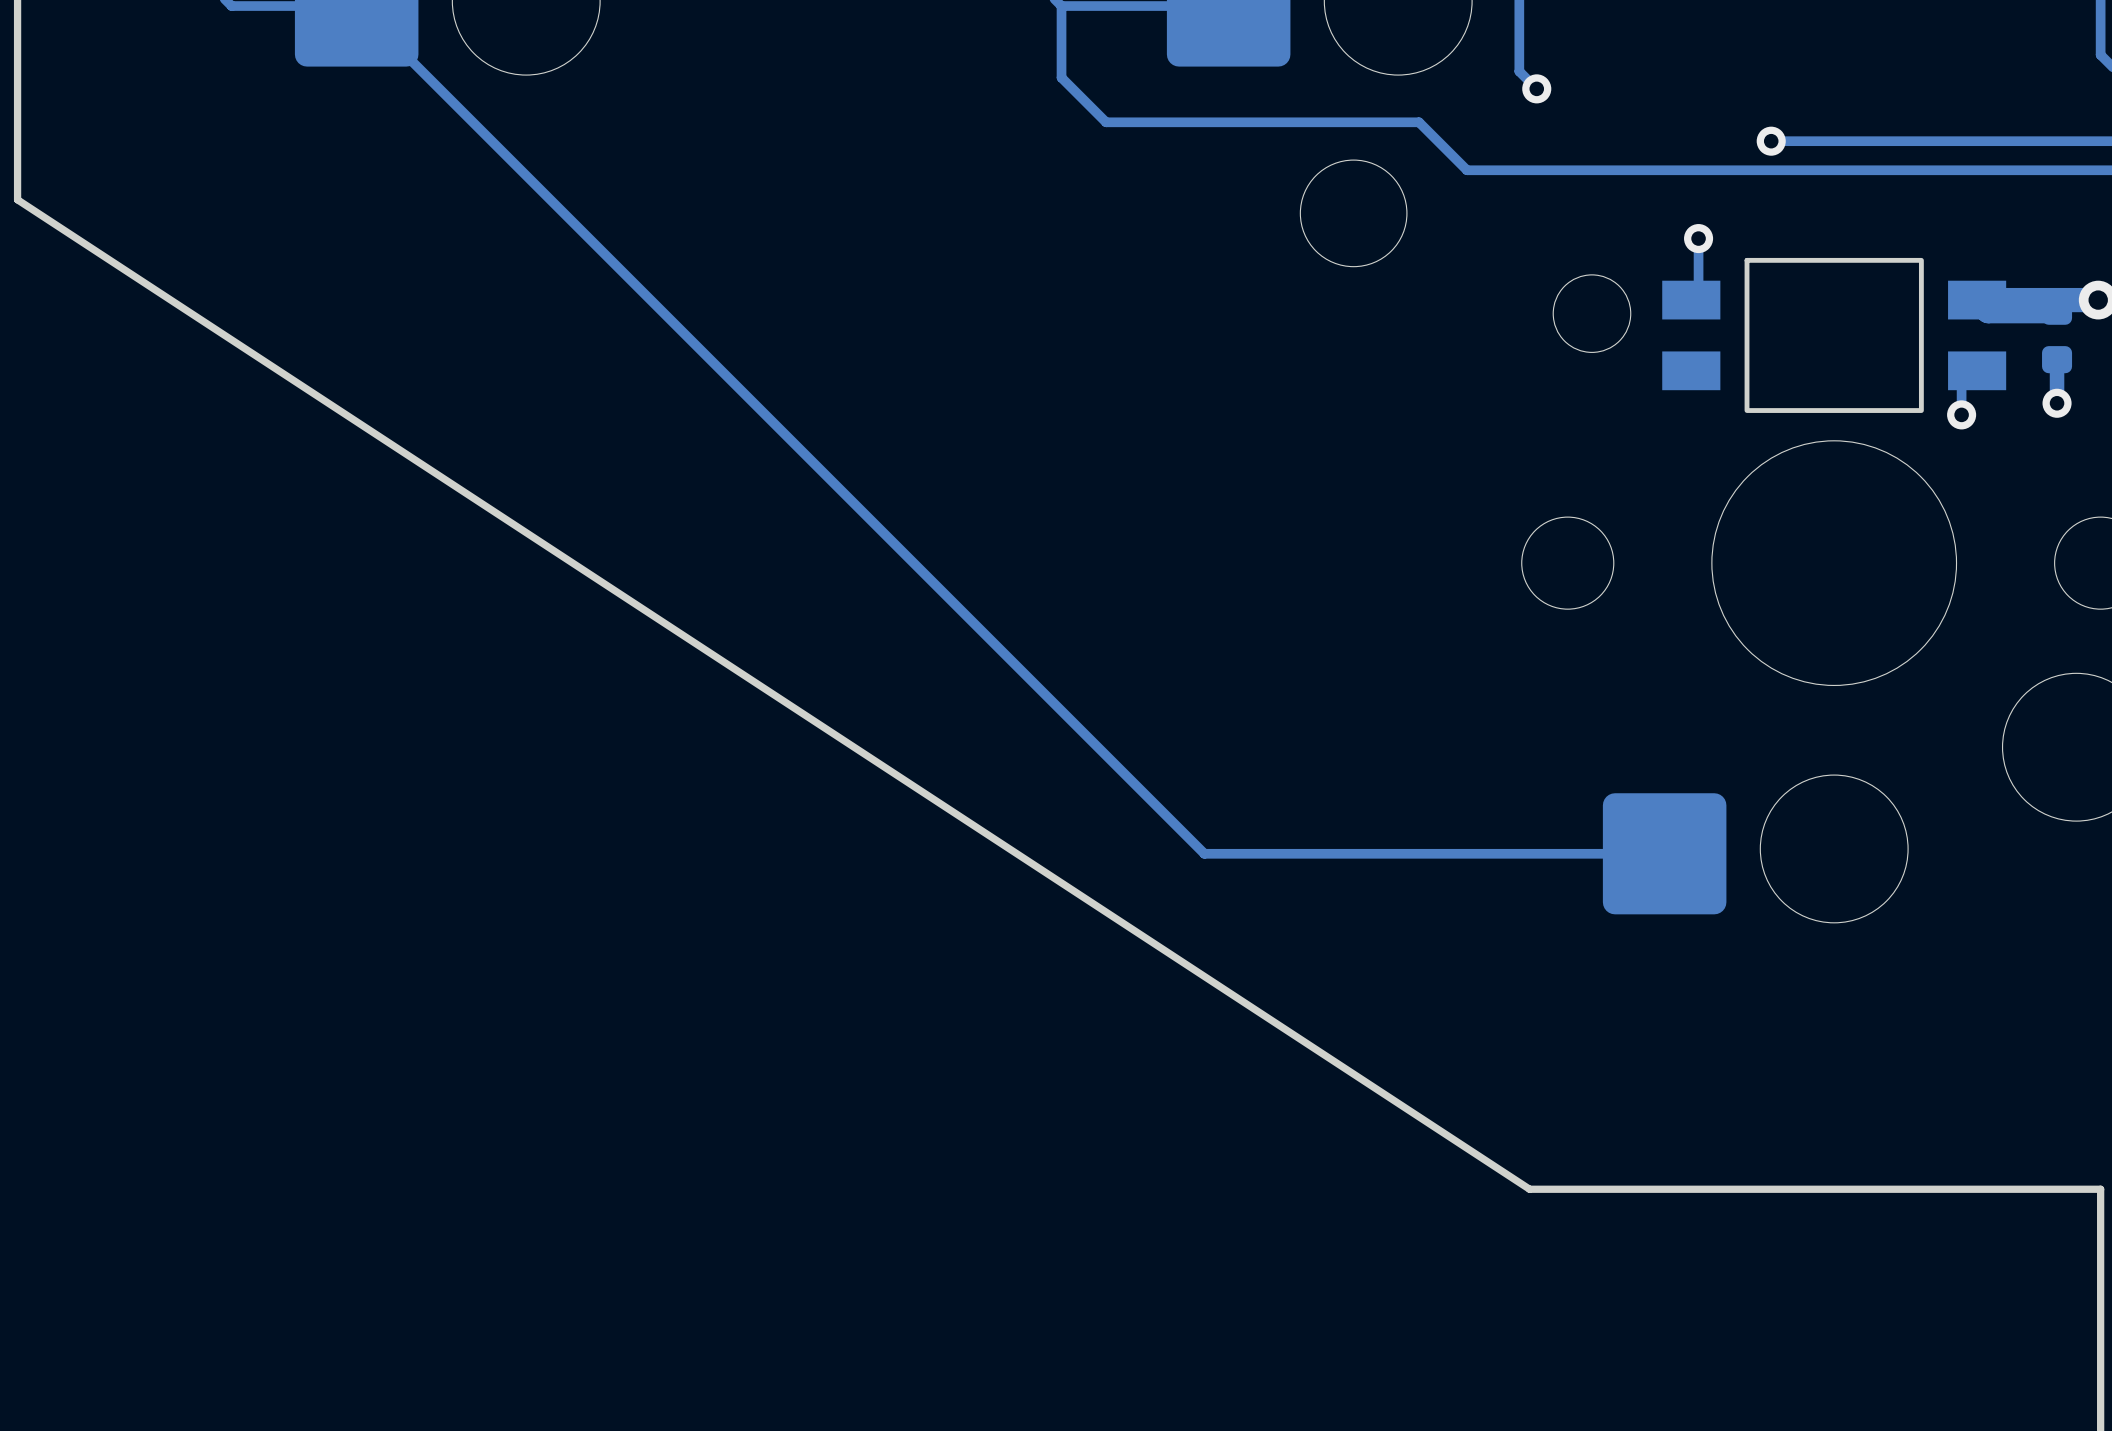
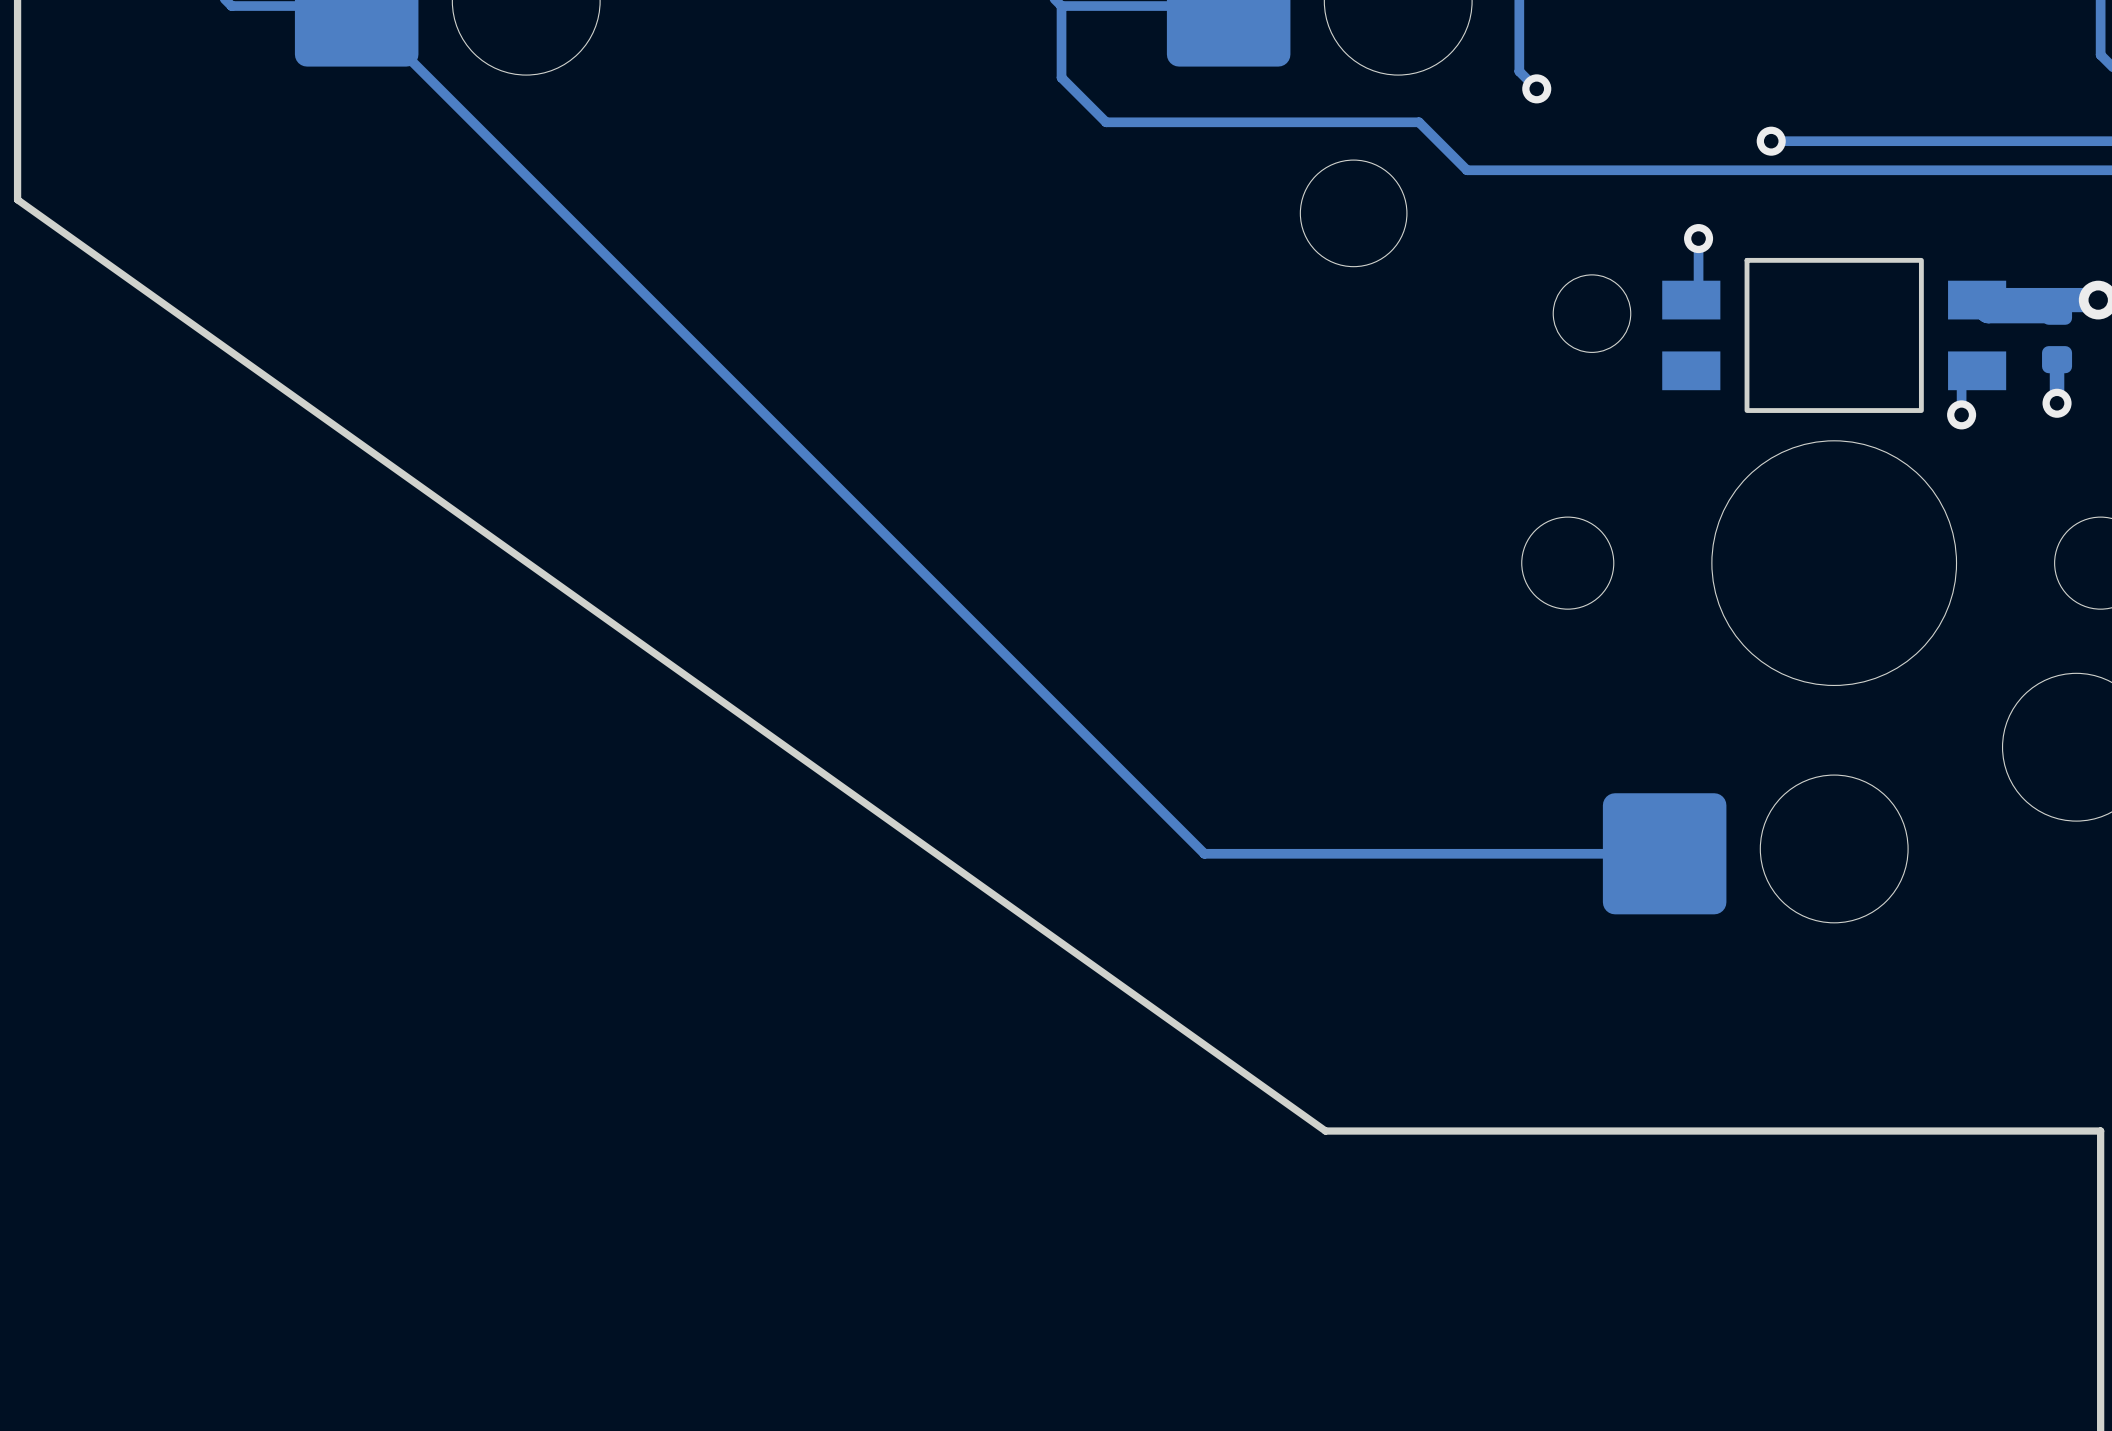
board edge: (17, 199) (1529, 1189) (2100, 1189) -> (17, 199) (1325, 1131) (2100, 1131) (2100, 1189)

